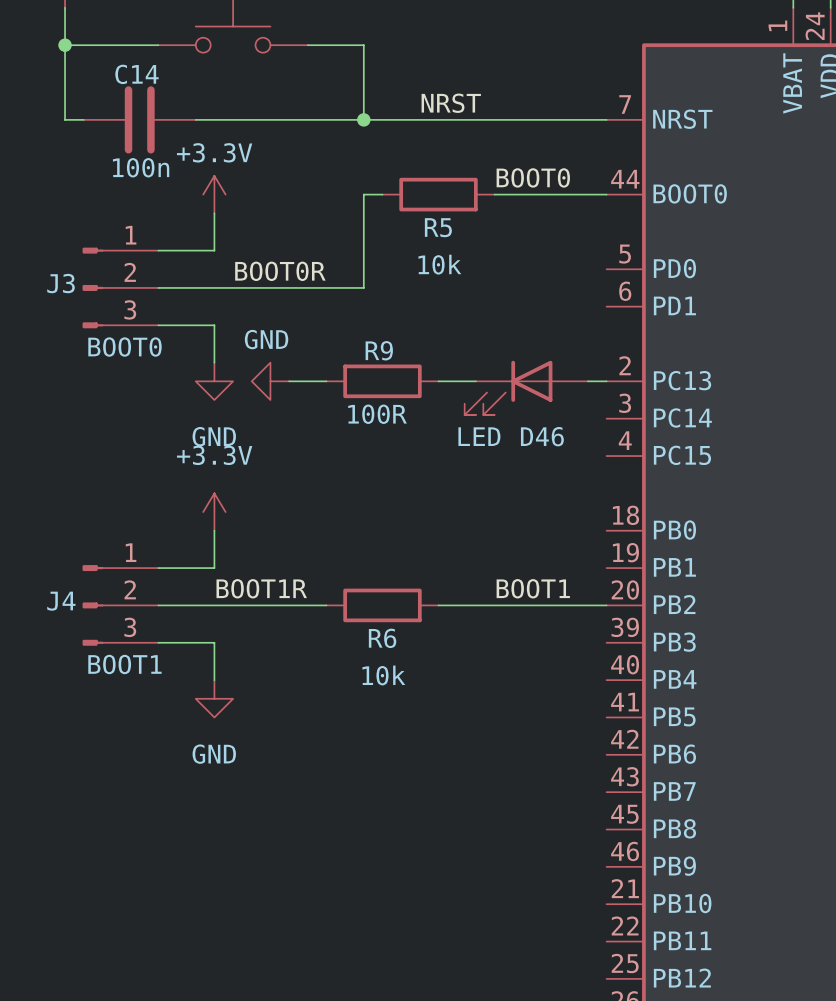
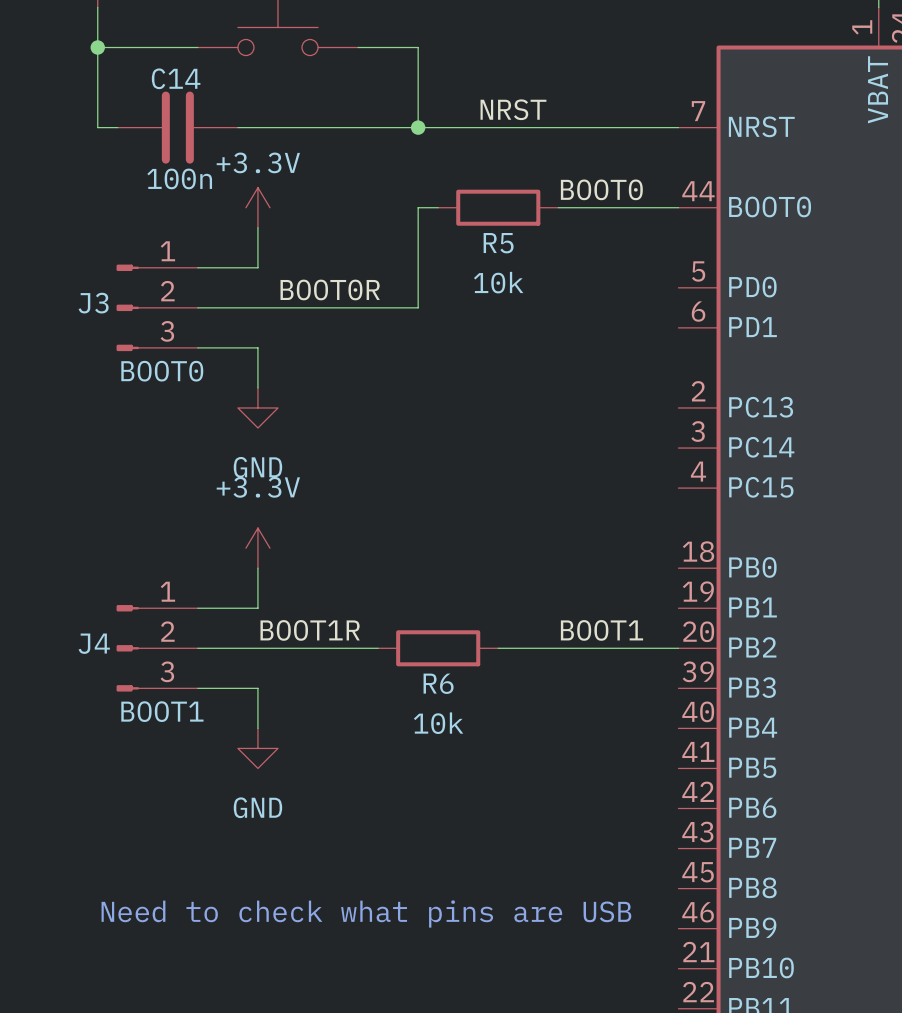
power symbol: GND (270, 381) -> none
wire: (289, 381) (326, 381) -> none
R9: 100R (382, 381) -> none
wire: (438, 381) (475, 381) -> none
wire: (587, 381) (606, 381) -> none
D46: LED (526, 387) -> none
text: none -> Need to check what pins are USB (366, 914)

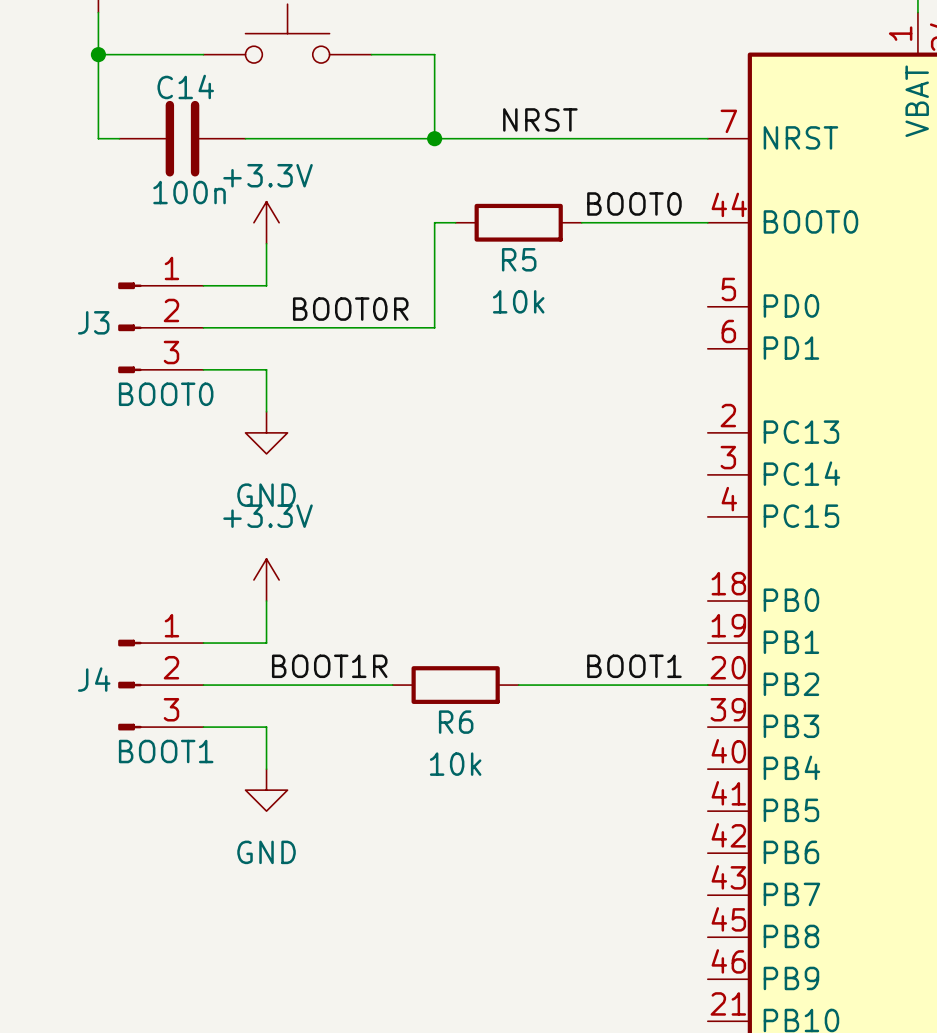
text: Need to check what pins are USB (366, 914) -> none

